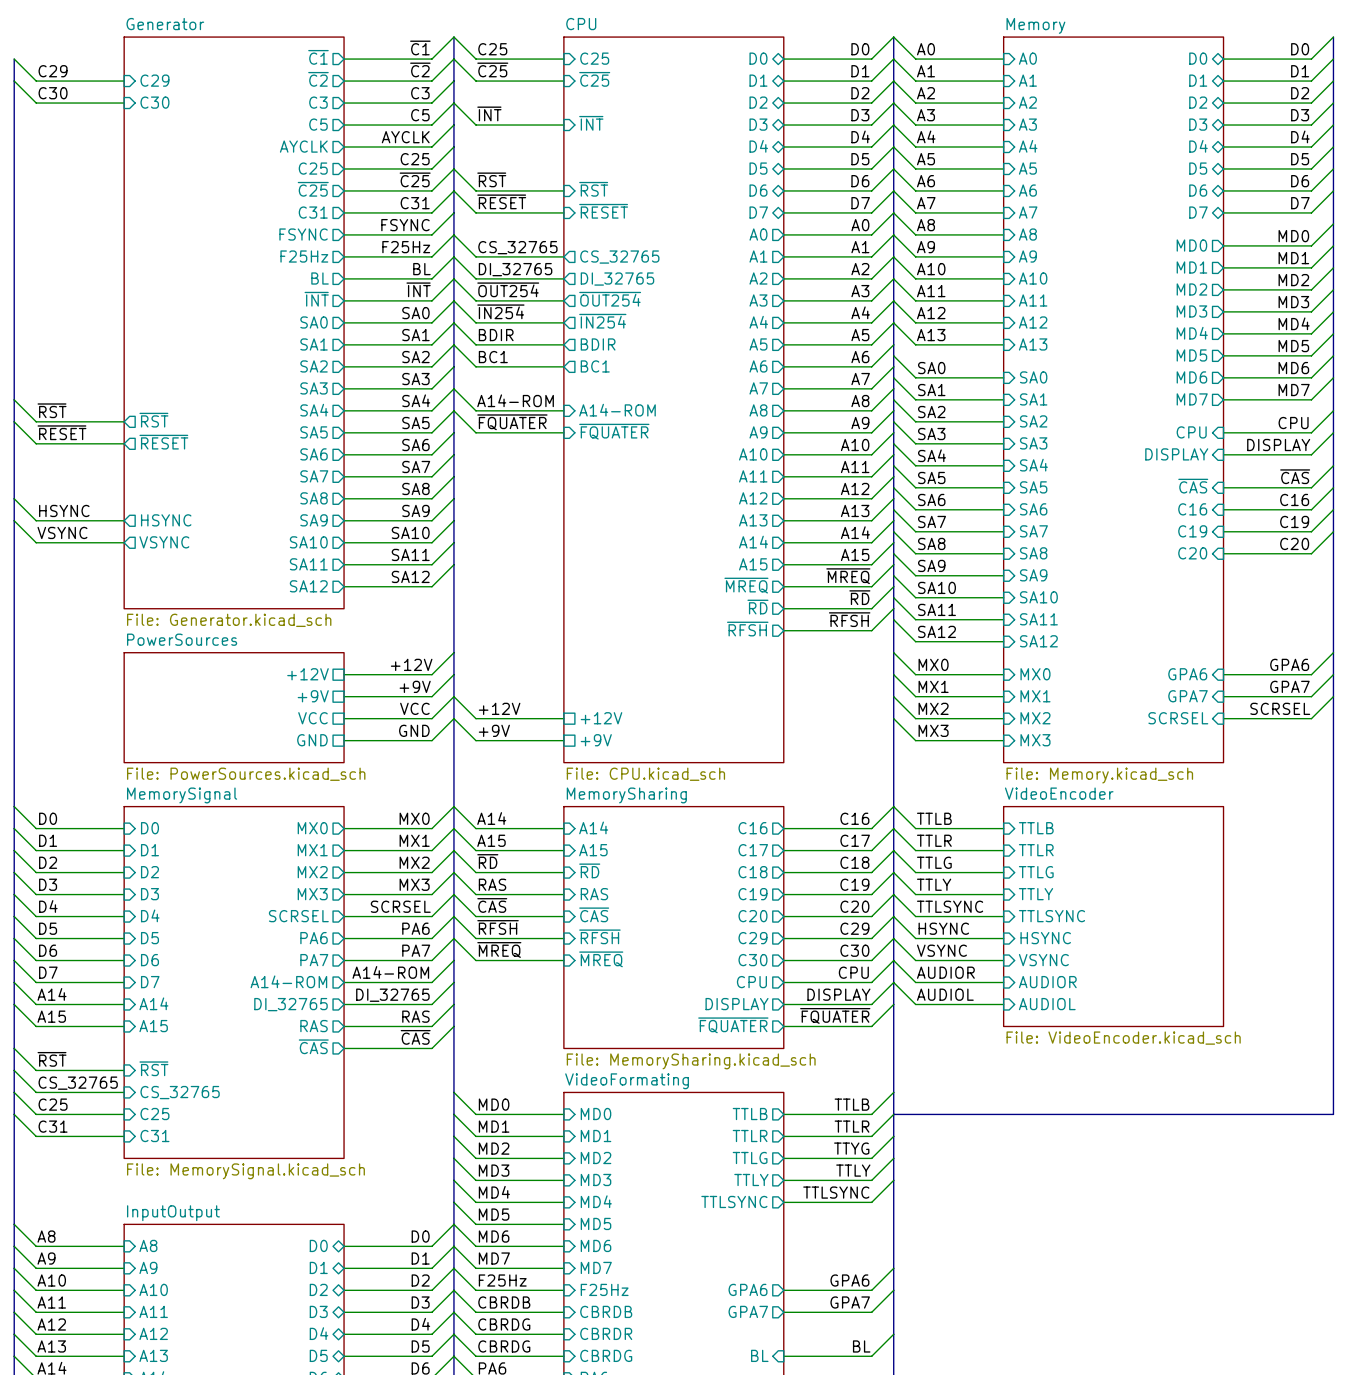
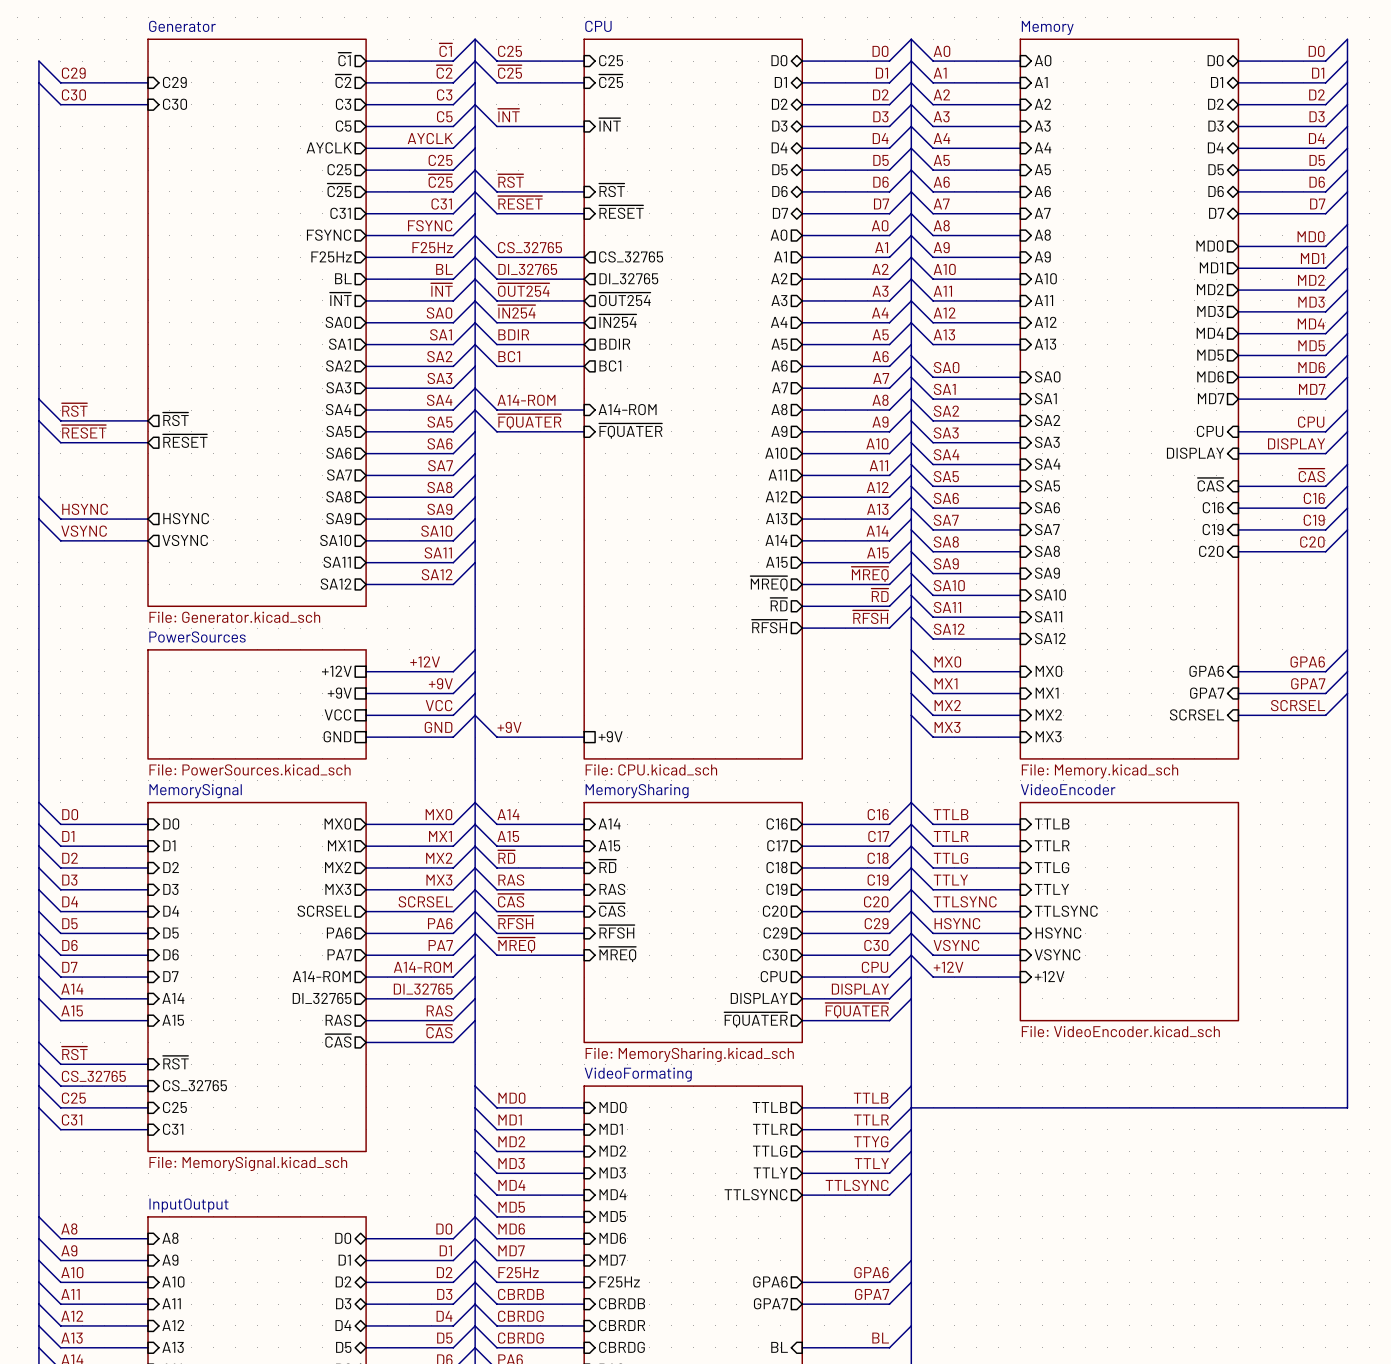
wire: (453, 696) (475, 718) (563, 718) -> none
label: +12V (499, 708) -> none
sheet pin: +12V (601, 718) -> none
label: AUDIOR (945, 972) -> +12V (948, 967)
wire: (893, 982) (915, 1004) (1003, 1004) -> none
sheet pin: AUDIOR (1047, 982) -> +12V (1049, 976)
label: AUDIOL (945, 994) -> none
sheet pin: AUDIOL (1047, 1004) -> none

